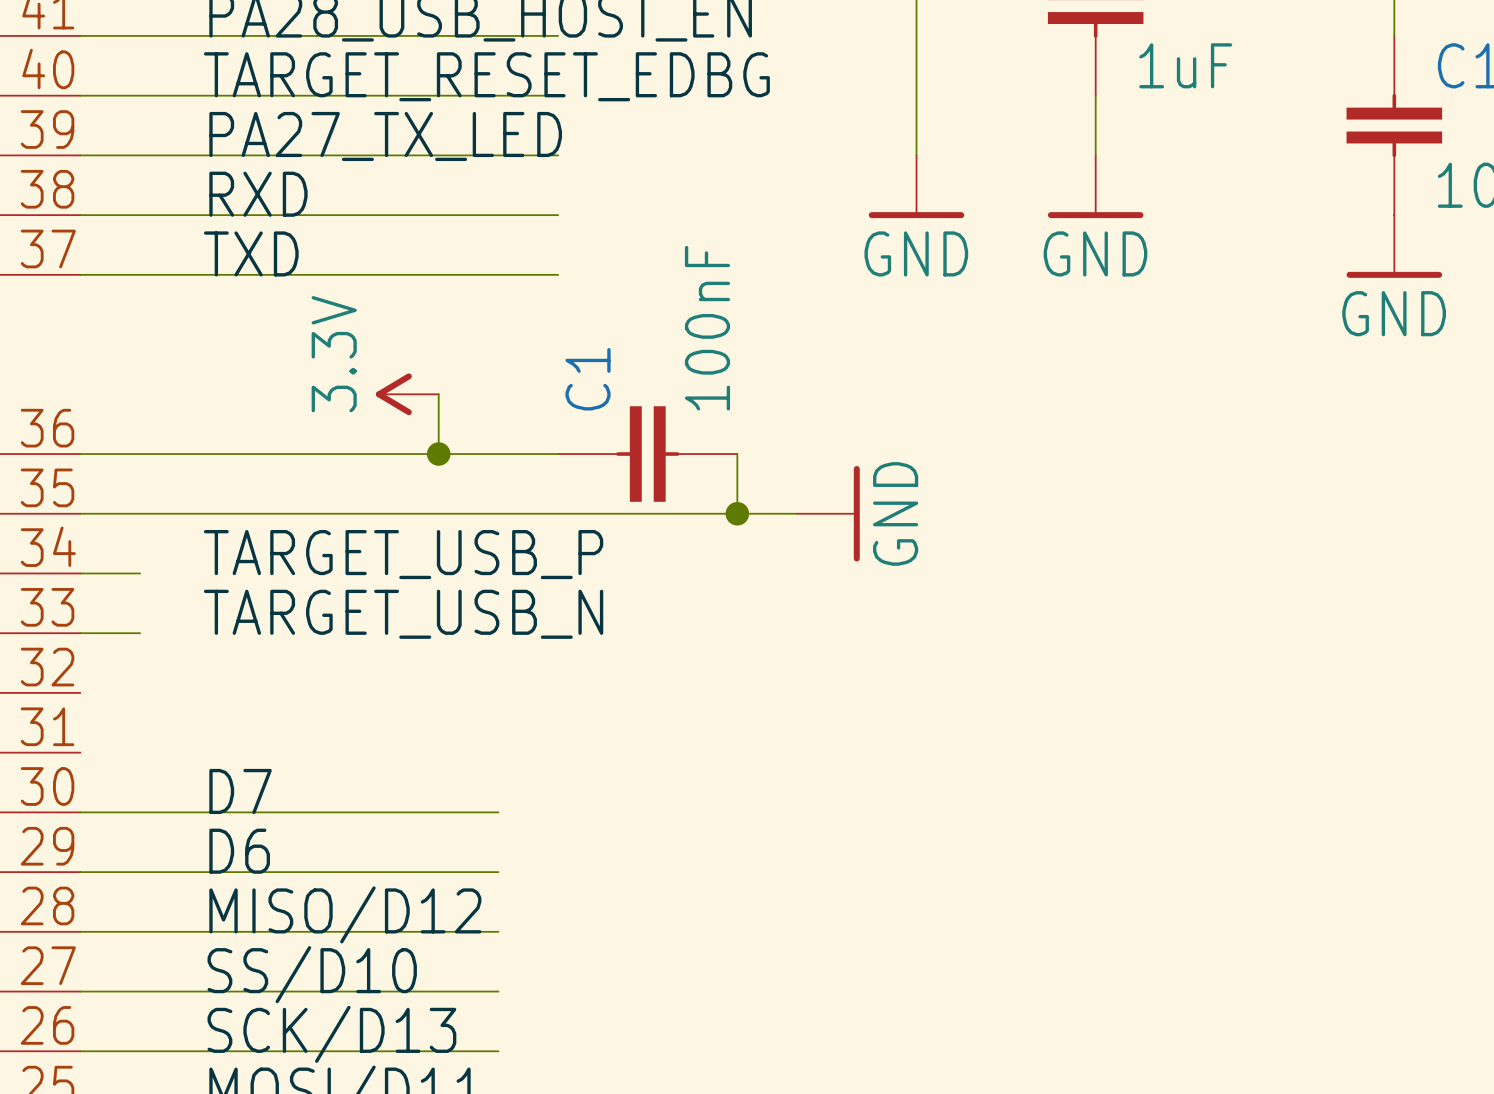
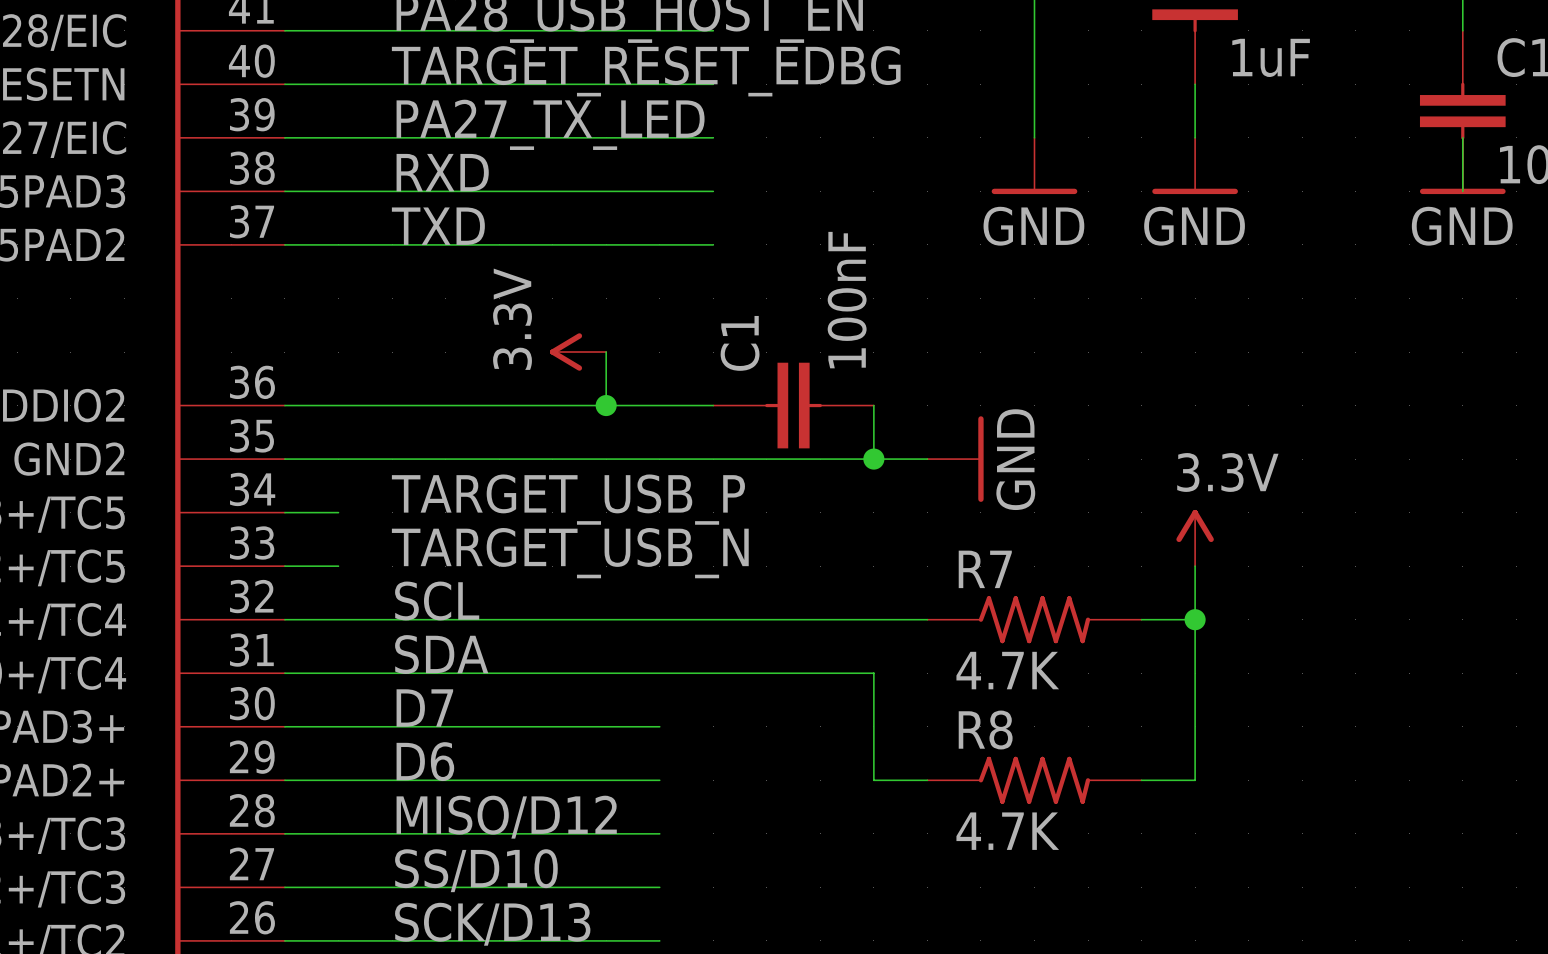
power symbol position: GND (1394, 246) -> GND (1462, 165)
power symbol: none -> 3.3V (1195, 538)
wire: none -> (1195, 566) (1195, 780) (1141, 780)
label: none -> SCL (437, 600)
wire: none -> (284, 619) (927, 619)
R7: none -> 4.7K (1034, 619)
wire: none -> (1141, 619) (1195, 619)
junction: none -> (1195, 619)
label: none -> SDA (441, 654)
wire: none -> (284, 673) (873, 673) (873, 780) (927, 780)
R8: none -> 4.7K (1034, 780)

